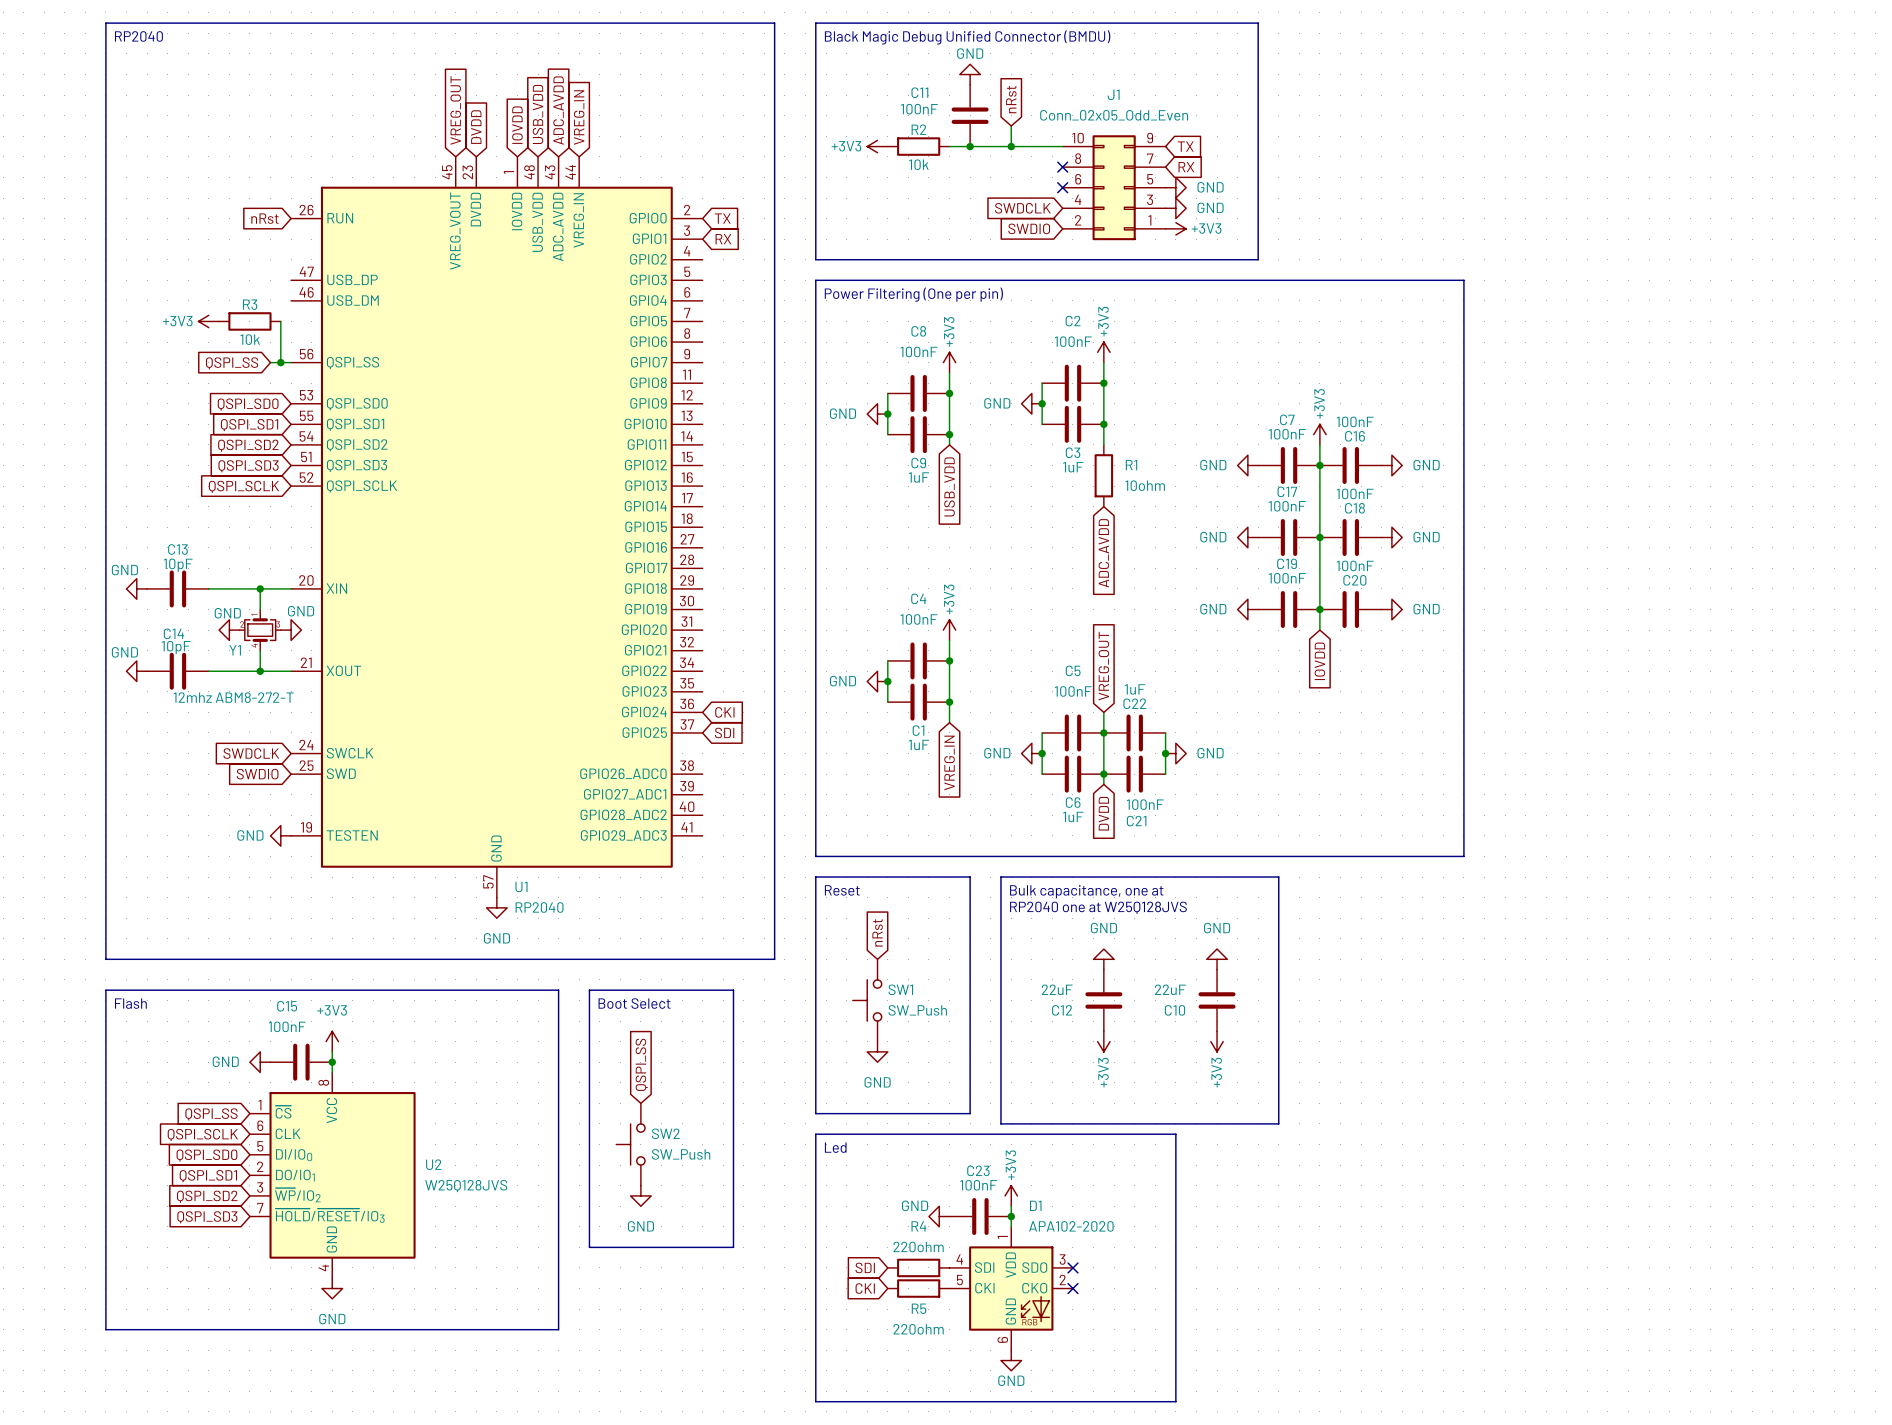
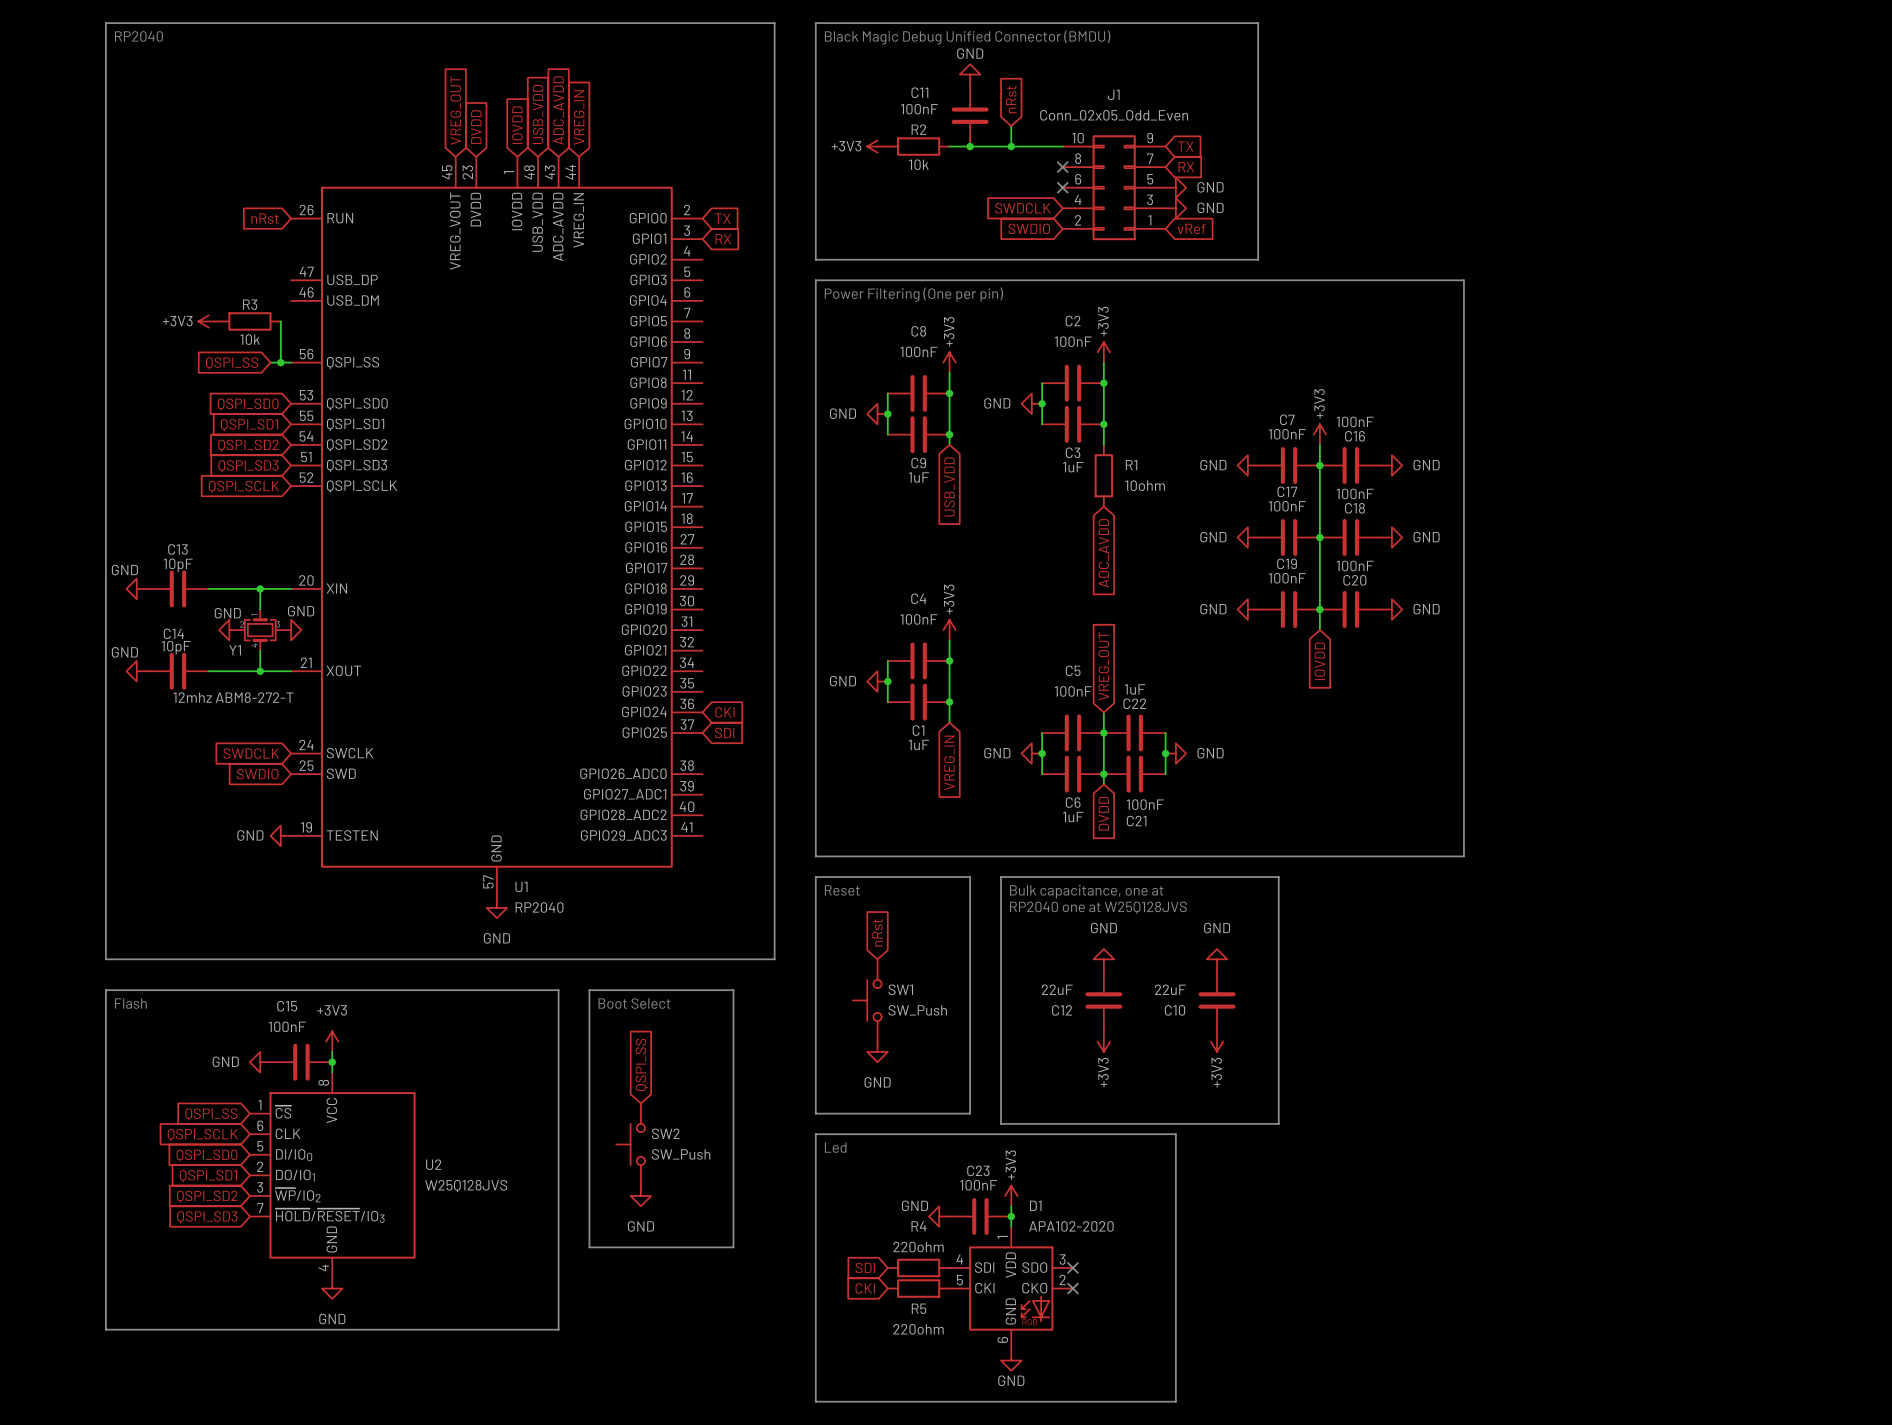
power symbol: +3V3 (1175, 228) -> none
global label: none -> vRef (1191, 228)

